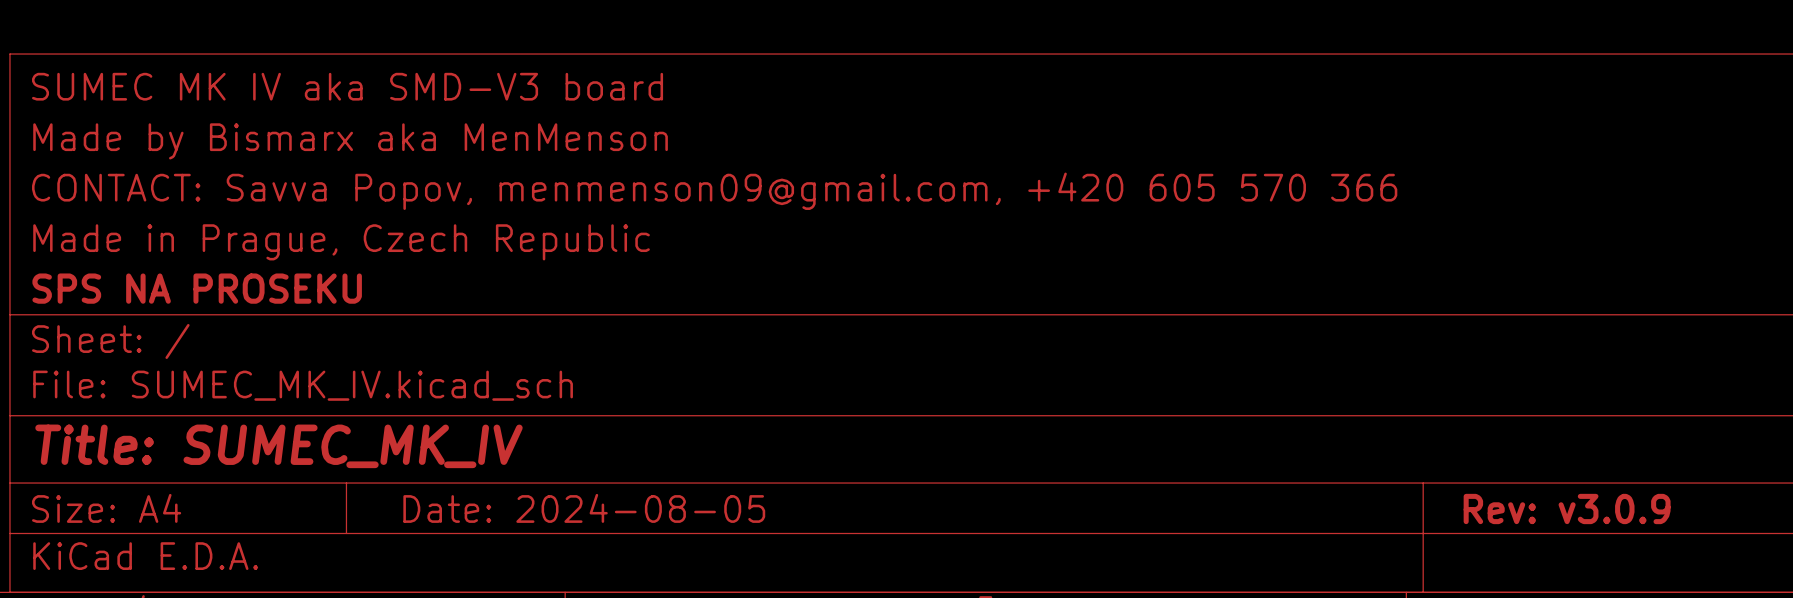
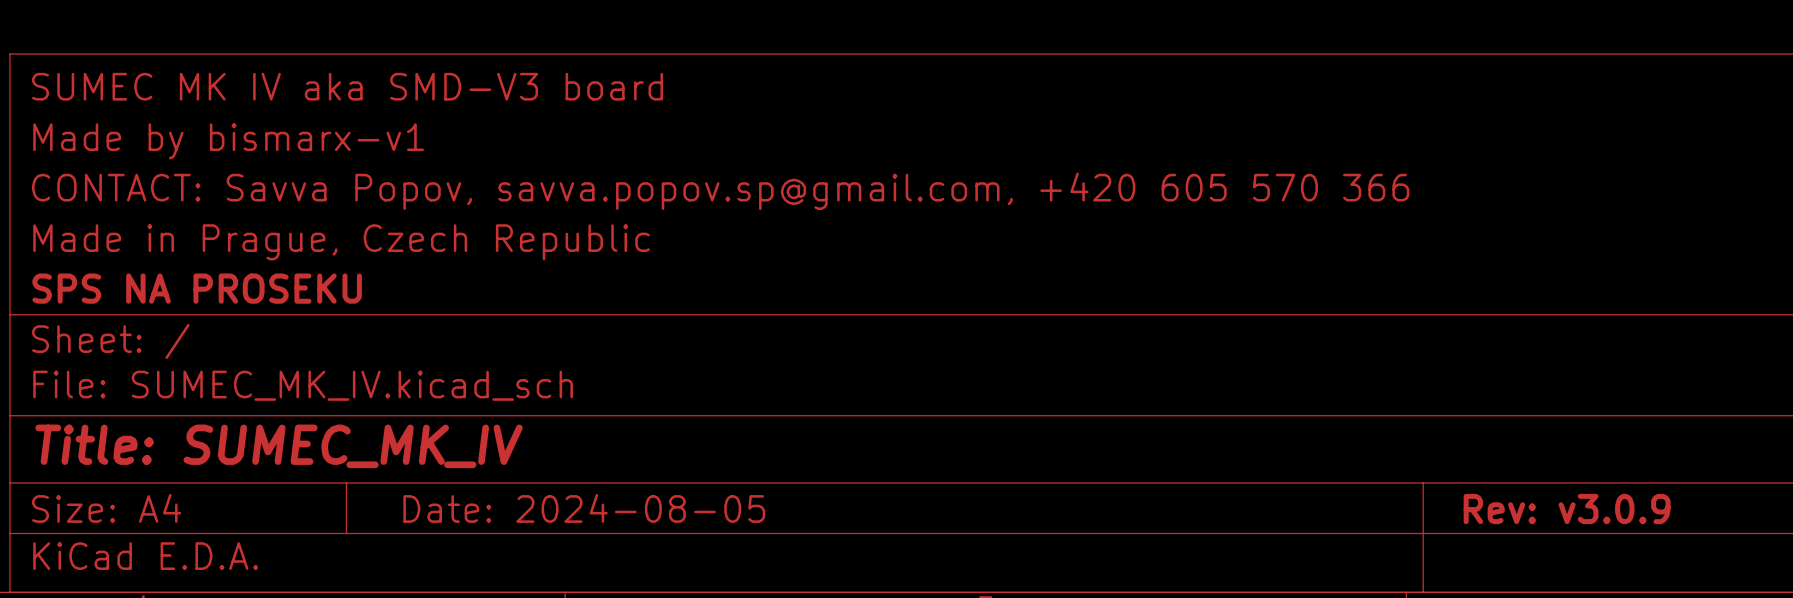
title block: Made by Bismarx aka MenMenson (350, 141) -> Made by bismarx-v1 (228, 141)
title block: CONTACT: Savva Popov, menmenson09@gmail.com, +420 605 570 366 (714, 191) -> CONTACT: Savva Popov, savva.popov.sp@gmail.com, +420 605 570 366 (720, 191)

